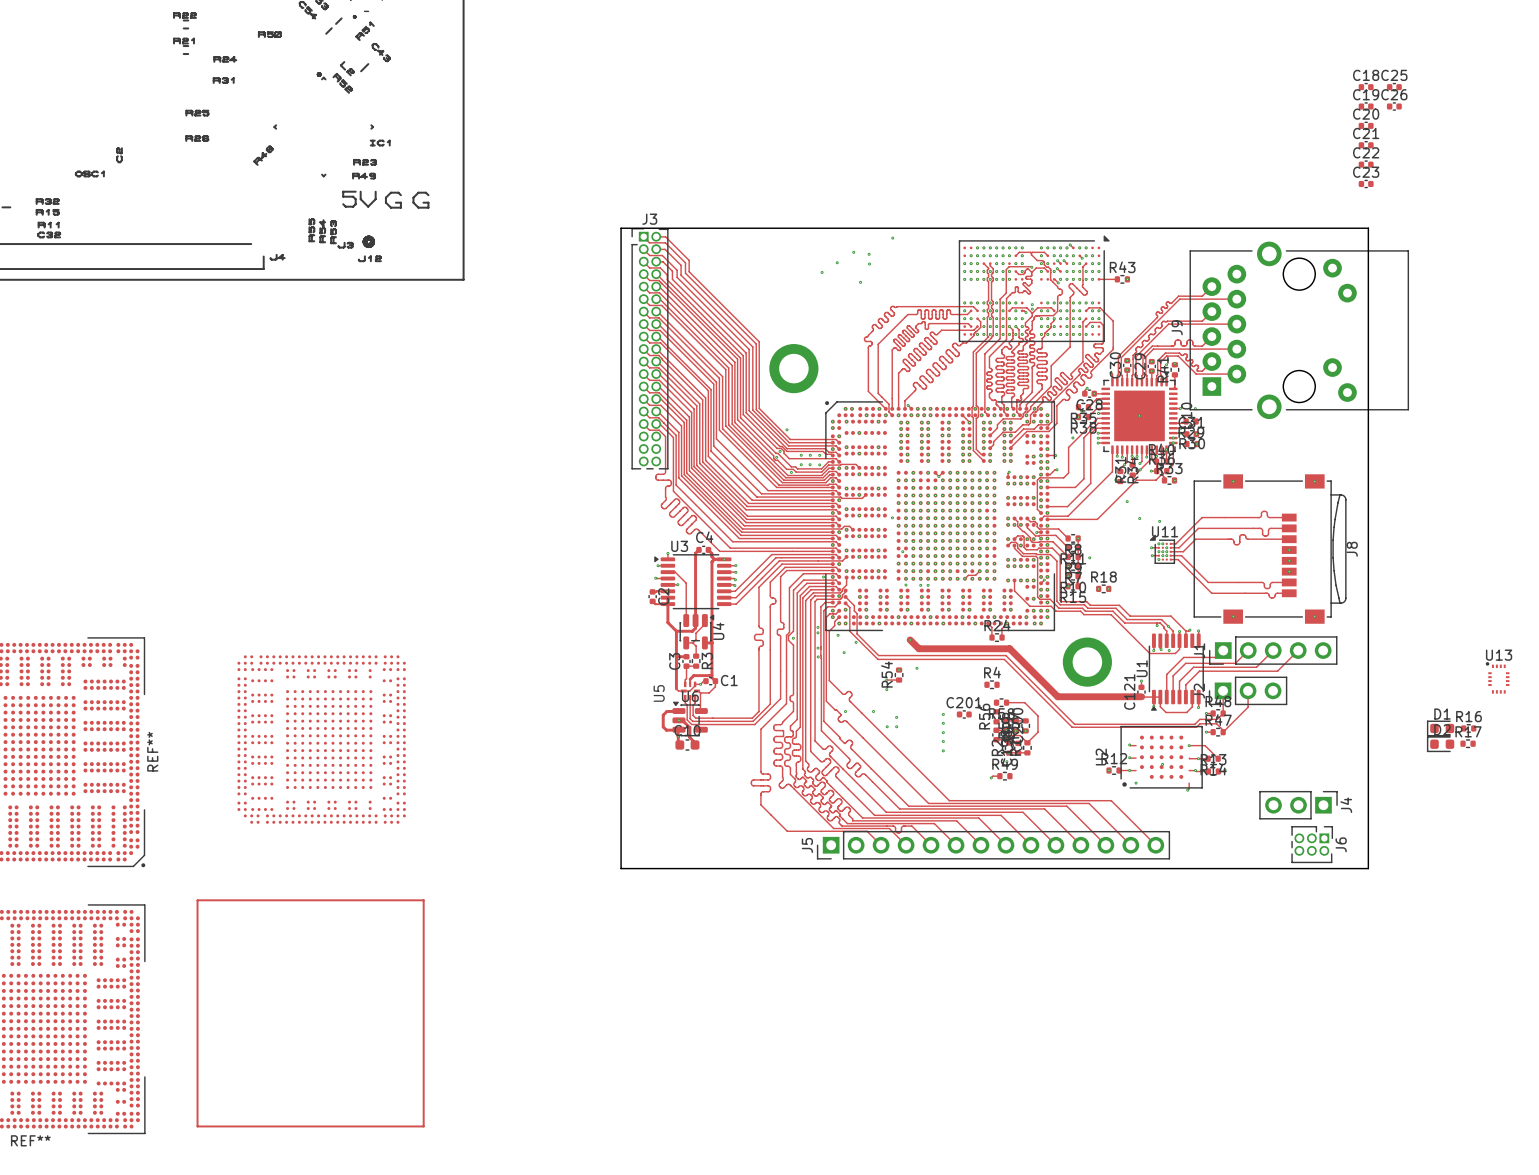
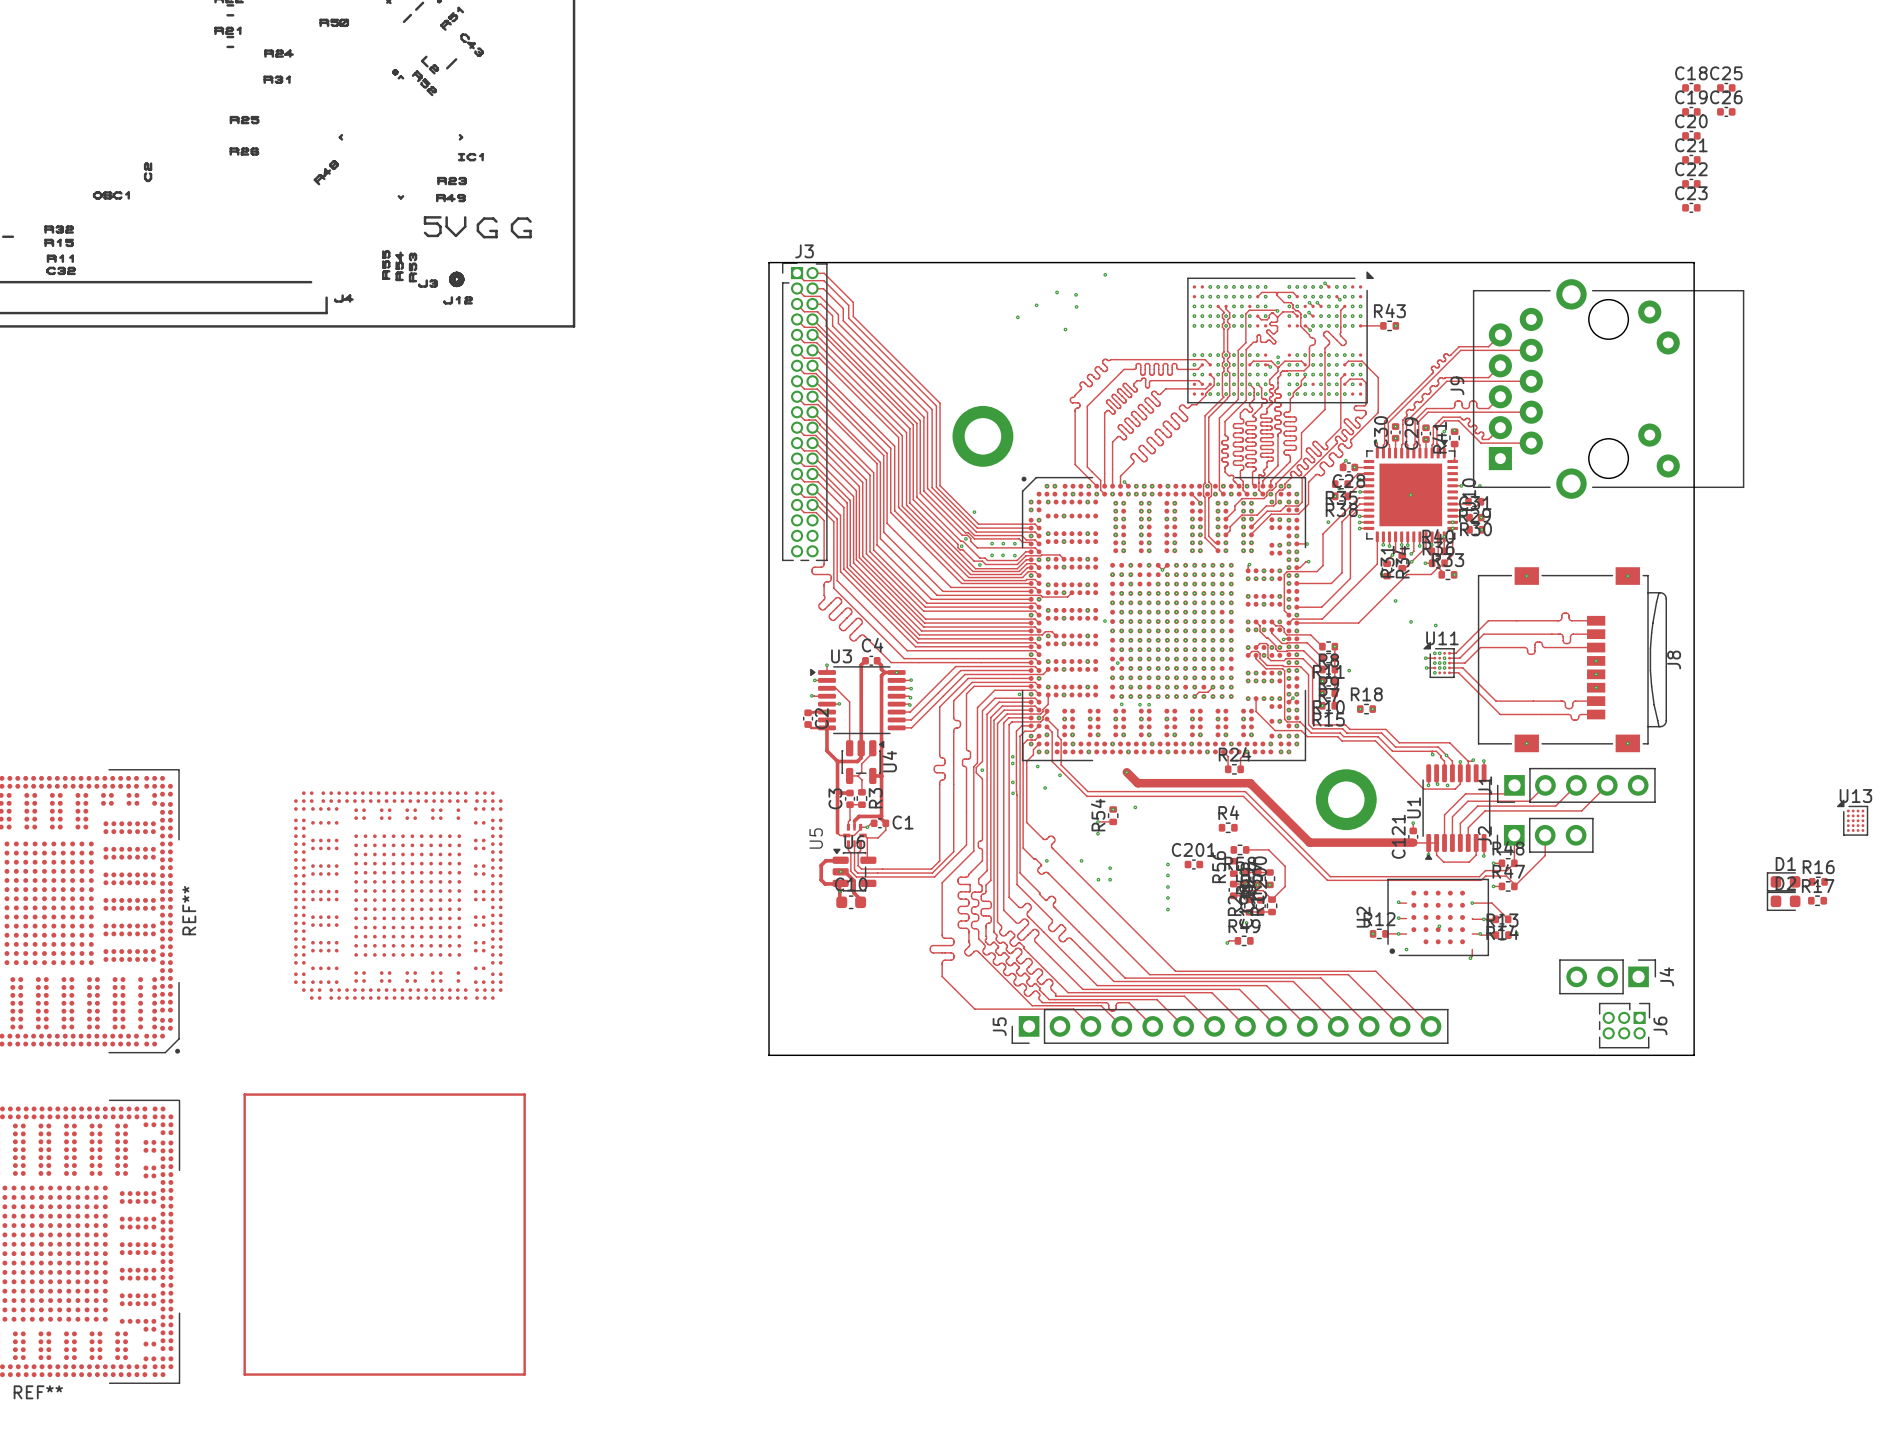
U13 footprint: [1485, 662, 1510, 694] -> [1836, 799, 1869, 836]

